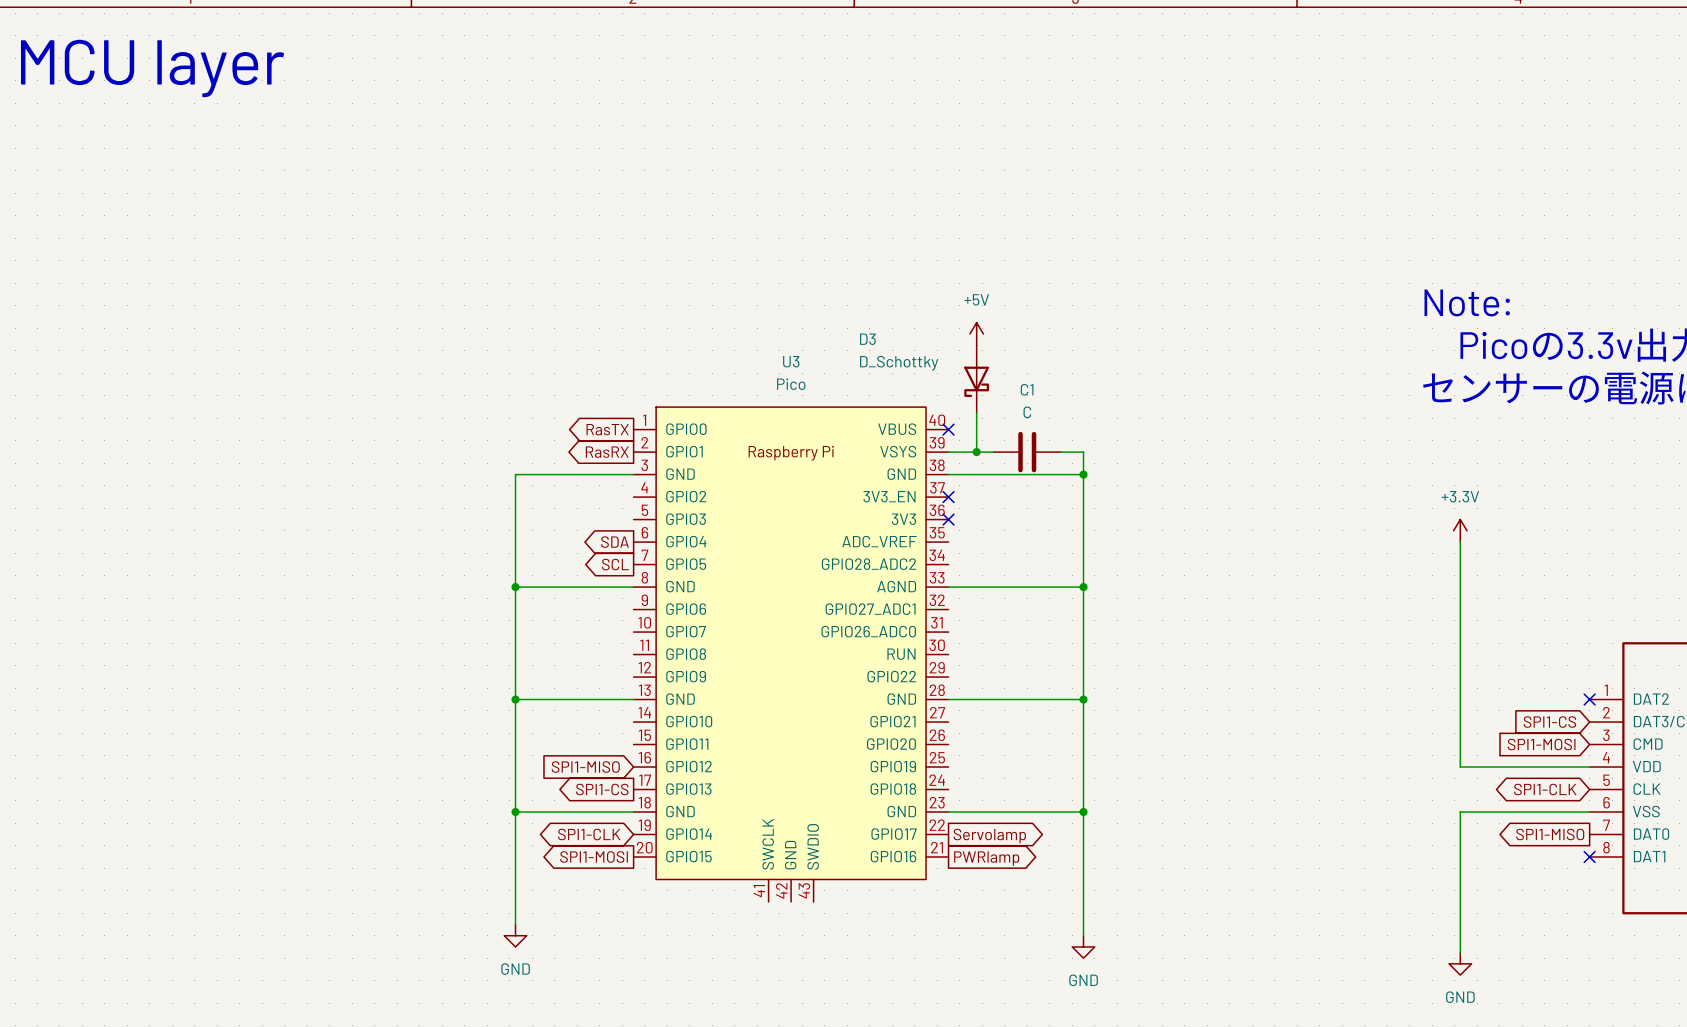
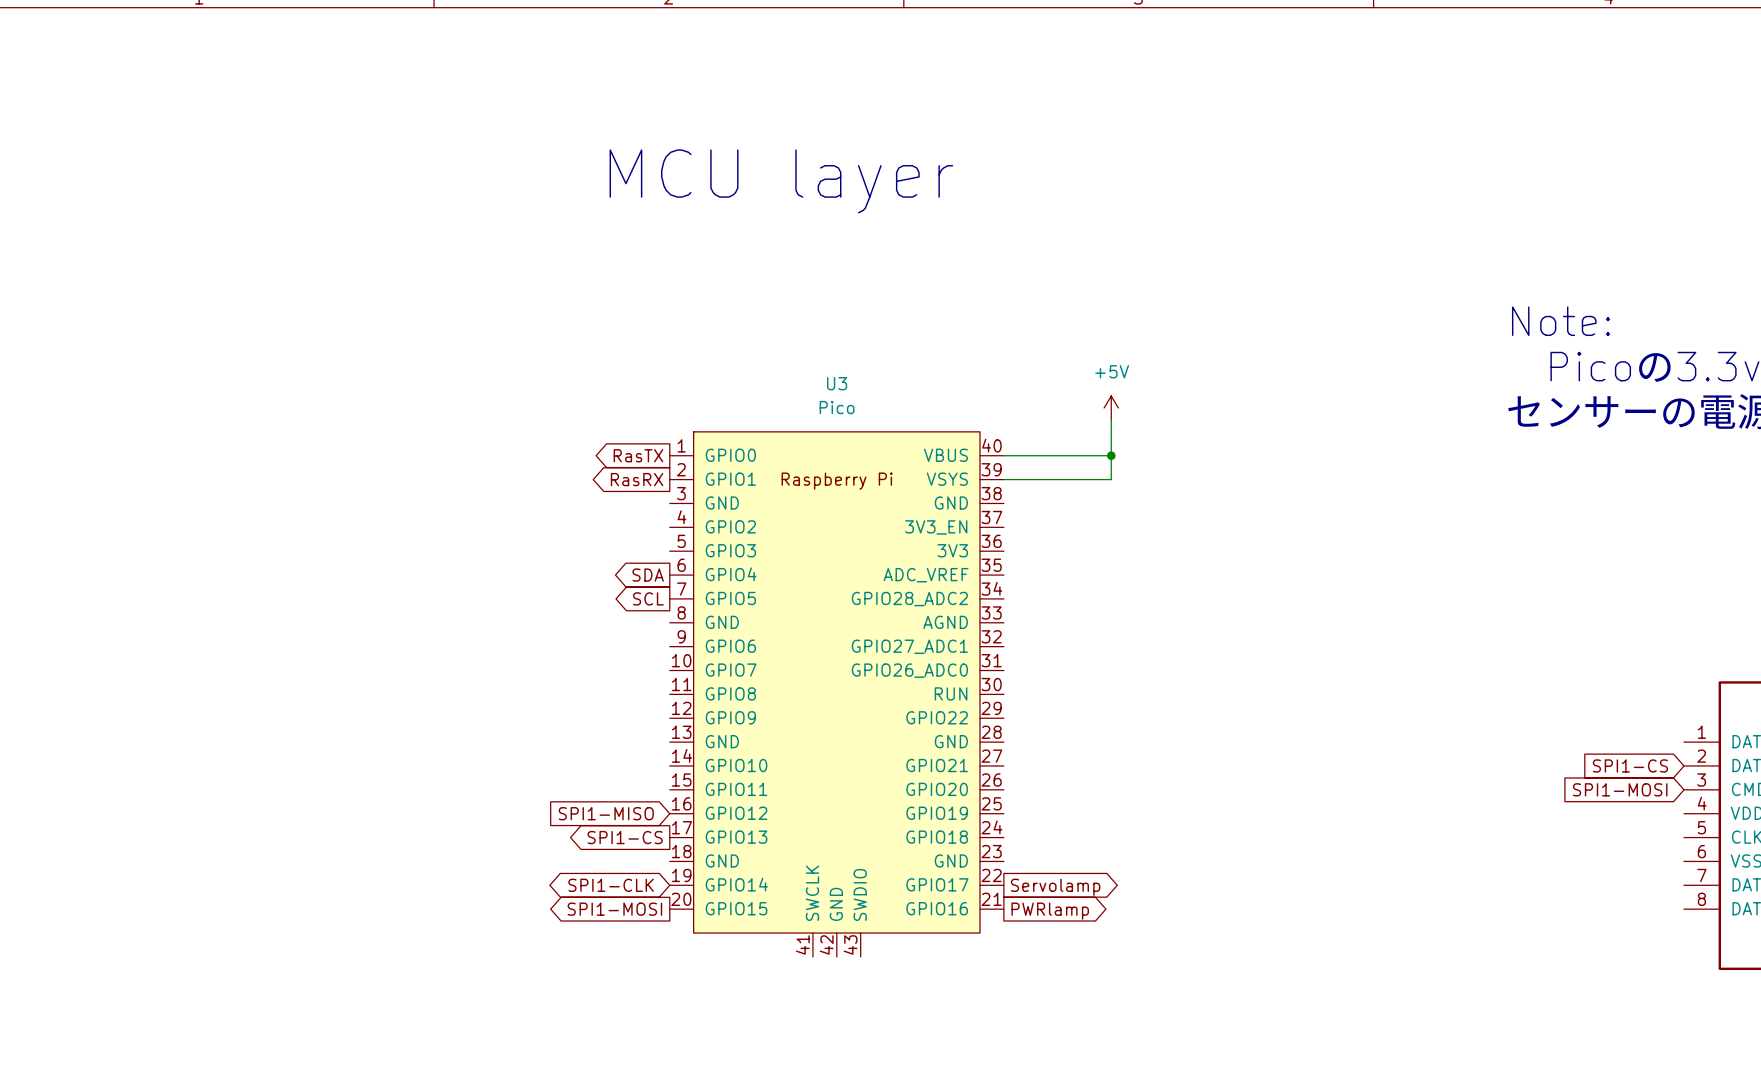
text: MCU layer (152, 68) -> none
text: none -> MCU layer (781, 181)
power symbol position: +5V (976, 333) -> +5V (1111, 408)
D3: D_Schottky (976, 378) -> none
wire: none -> (1111, 419) (1111, 479) (1051, 479)
wire: (976, 412) (976, 452) -> none
wire: none -> (1003, 455) (1111, 455)
no-connect mark: (948, 429) -> none
junction: none -> (1111, 455)
junction: (976, 452) -> none
C1: C (1027, 452) -> none
wire: (1061, 452) (1083, 452) (1083, 935) -> none
wire: (633, 474) (515, 474) (515, 924) -> none
wire: (948, 474) (1083, 474) -> none
junction: (1083, 474) -> none
no-connect mark: (948, 497) -> none
no-connect mark: (948, 519) -> none
power symbol: +3.3V (1460, 530) -> none
wire: (1460, 542) (1460, 767) (1589, 767) -> none
wire: (515, 587) (633, 587) -> none
junction: (515, 587) -> none
wire: (948, 587) (1083, 587) -> none
junction: (1083, 587) -> none
wire: (515, 699) (633, 699) -> none
junction: (515, 699) -> none
wire: (948, 699) (1083, 699) -> none
junction: (1083, 699) -> none
no-connect mark: (1589, 699) -> none
global label: SPI1-CLK (1545, 789) -> none
wire: (515, 812) (633, 812) -> none
junction: (515, 812) -> none
wire: (948, 812) (1083, 812) -> none
junction: (1083, 812) -> none
wire: (1589, 812) (1460, 812) (1460, 952) -> none
global label: SPI1-MISO (1550, 834) -> none
no-connect mark: (1589, 856) -> none
power symbol: GND (515, 935) -> none
power symbol: GND (1083, 946) -> none
power symbol: GND (1460, 963) -> none

